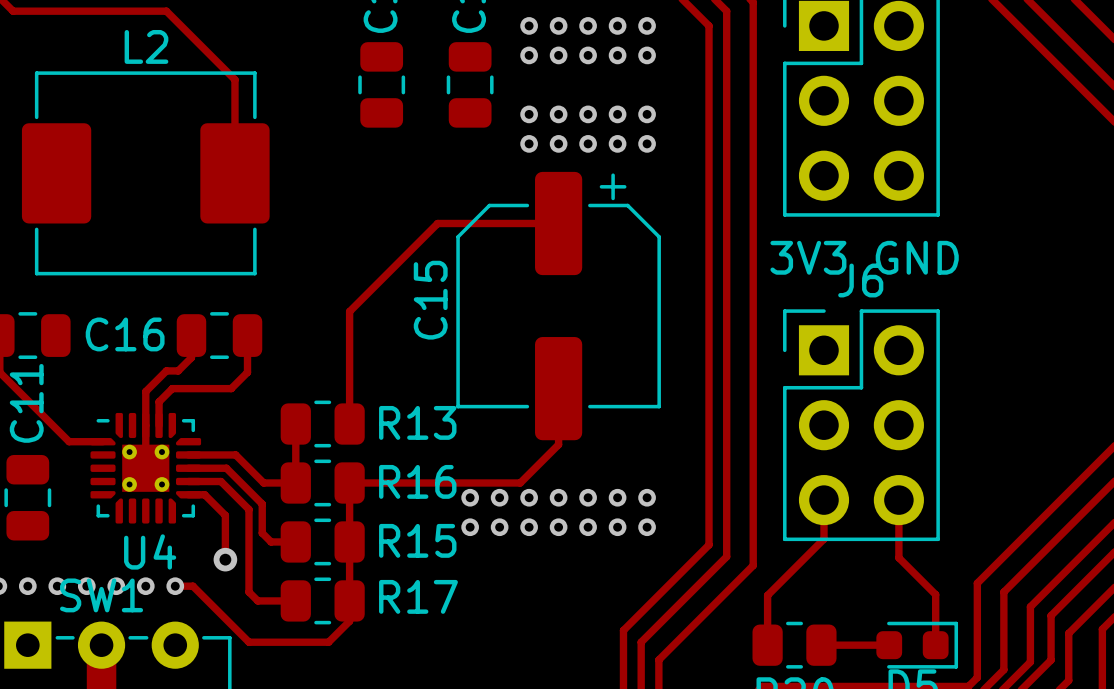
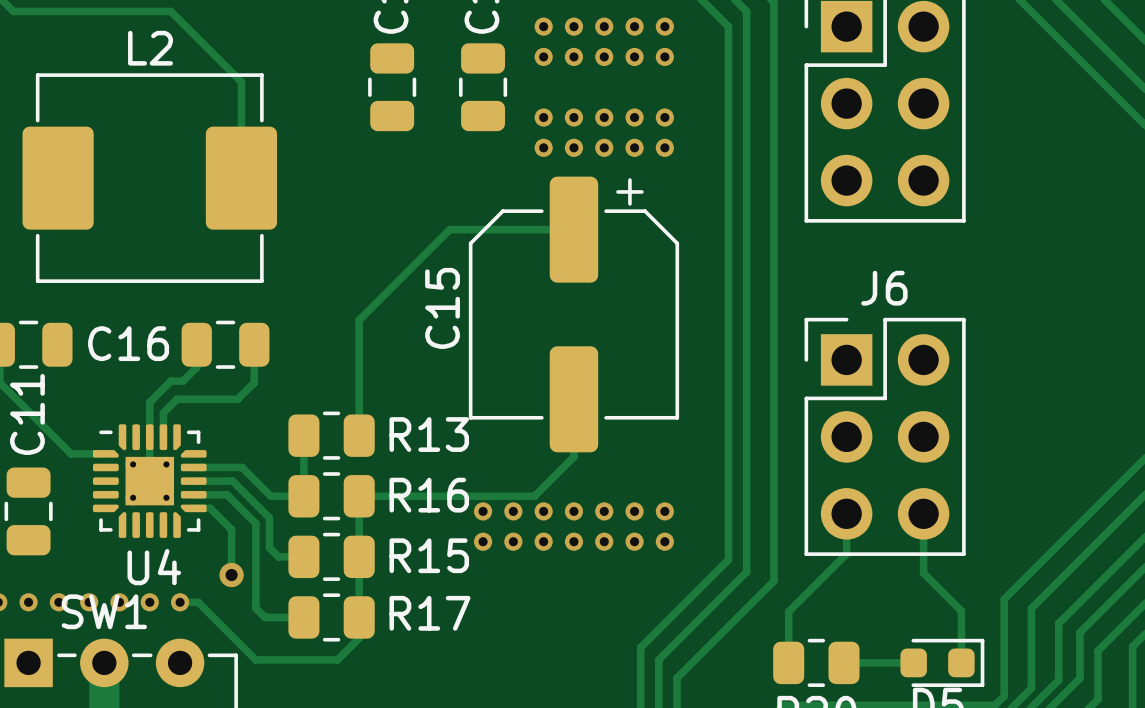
text: 3V3 GND (864, 257) -> none

